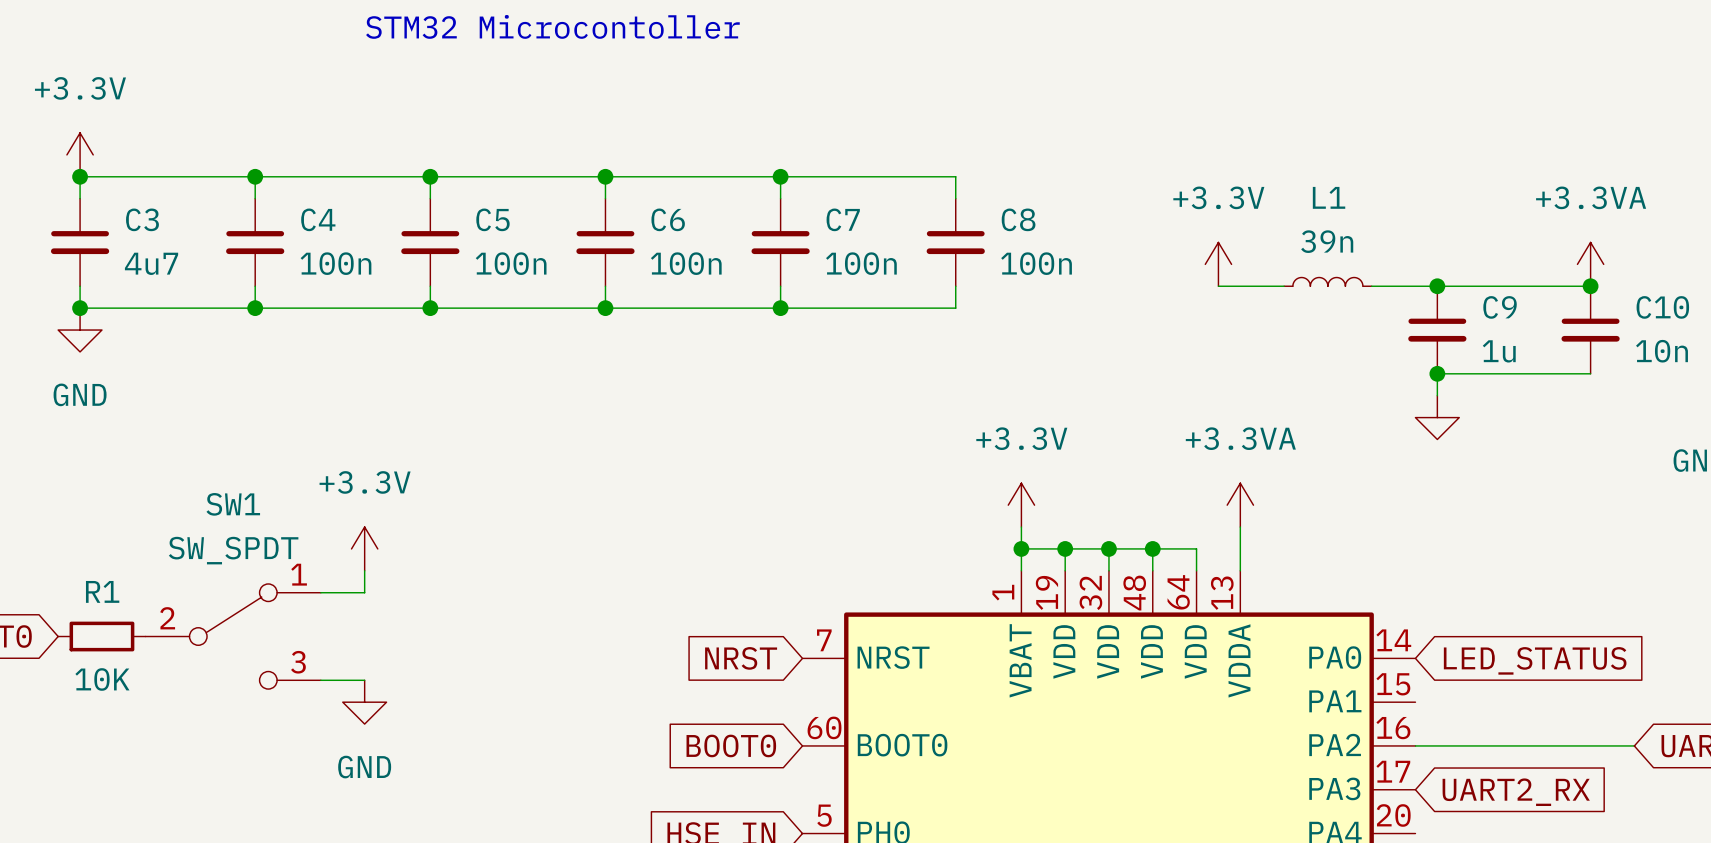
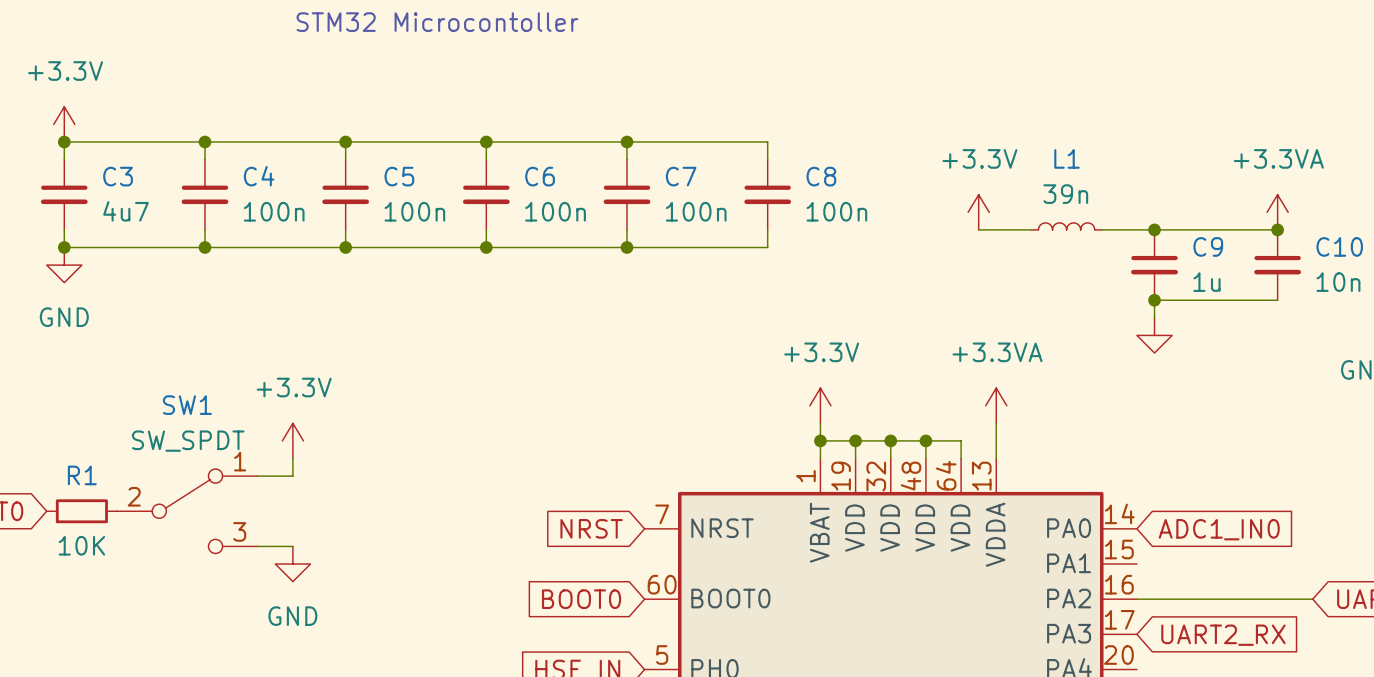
global label: LED_STATUS (1535, 660) -> ADC1_IN0 (1219, 529)

